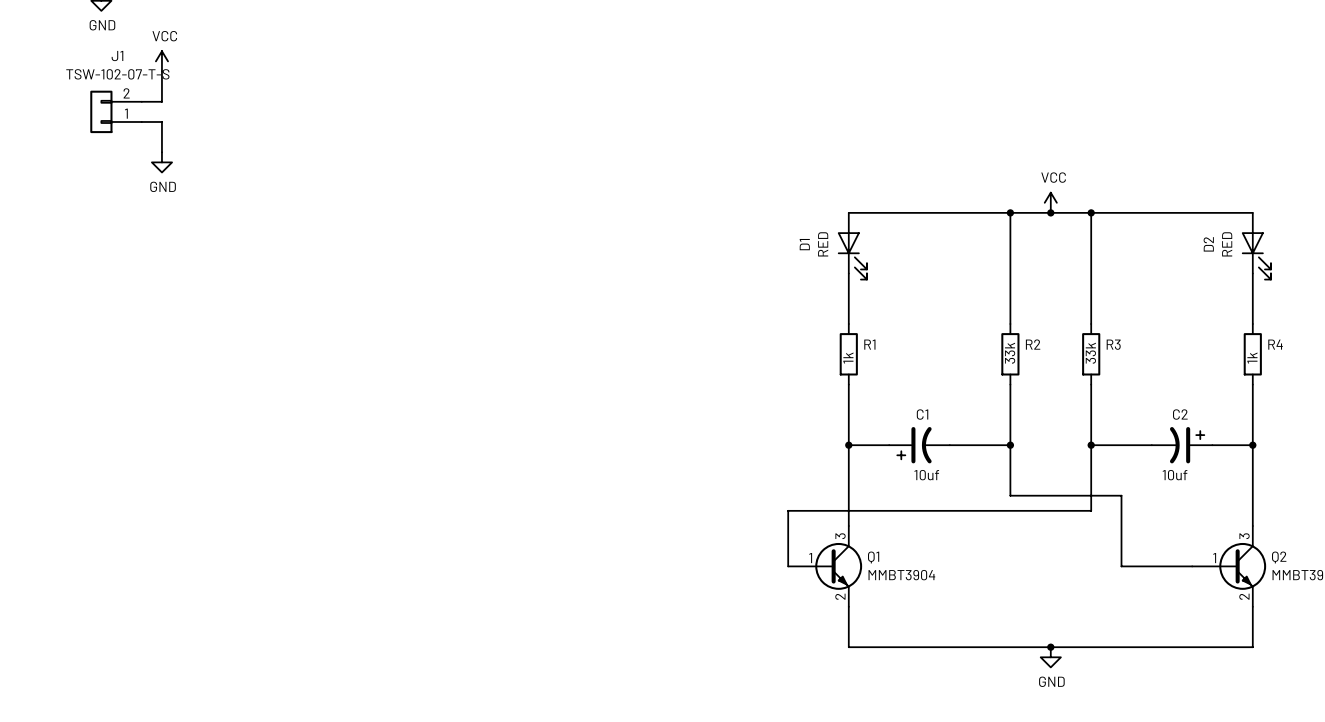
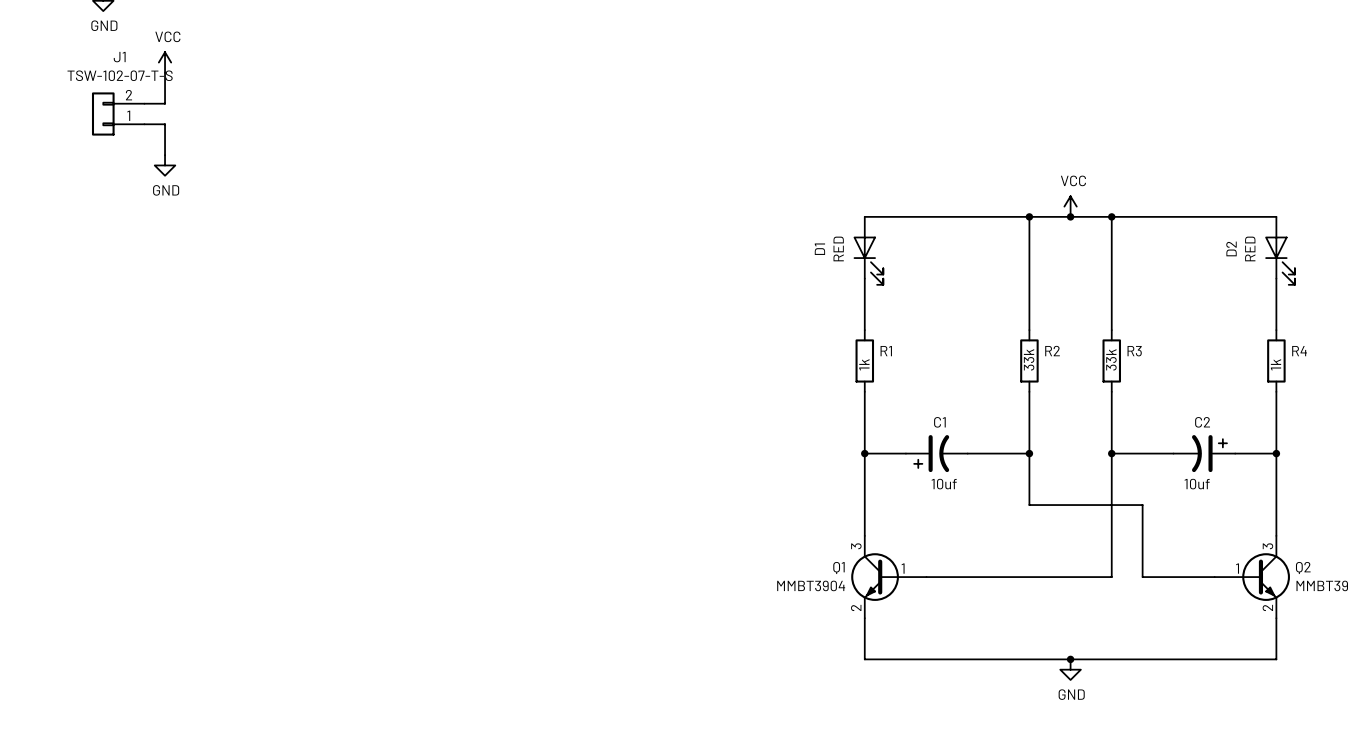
wire: (1091, 510) (788, 510) (788, 566) -> (1111, 520) (1111, 577) (926, 577)
Q1 flip: as is (838, 566) -> left-right (875, 577)

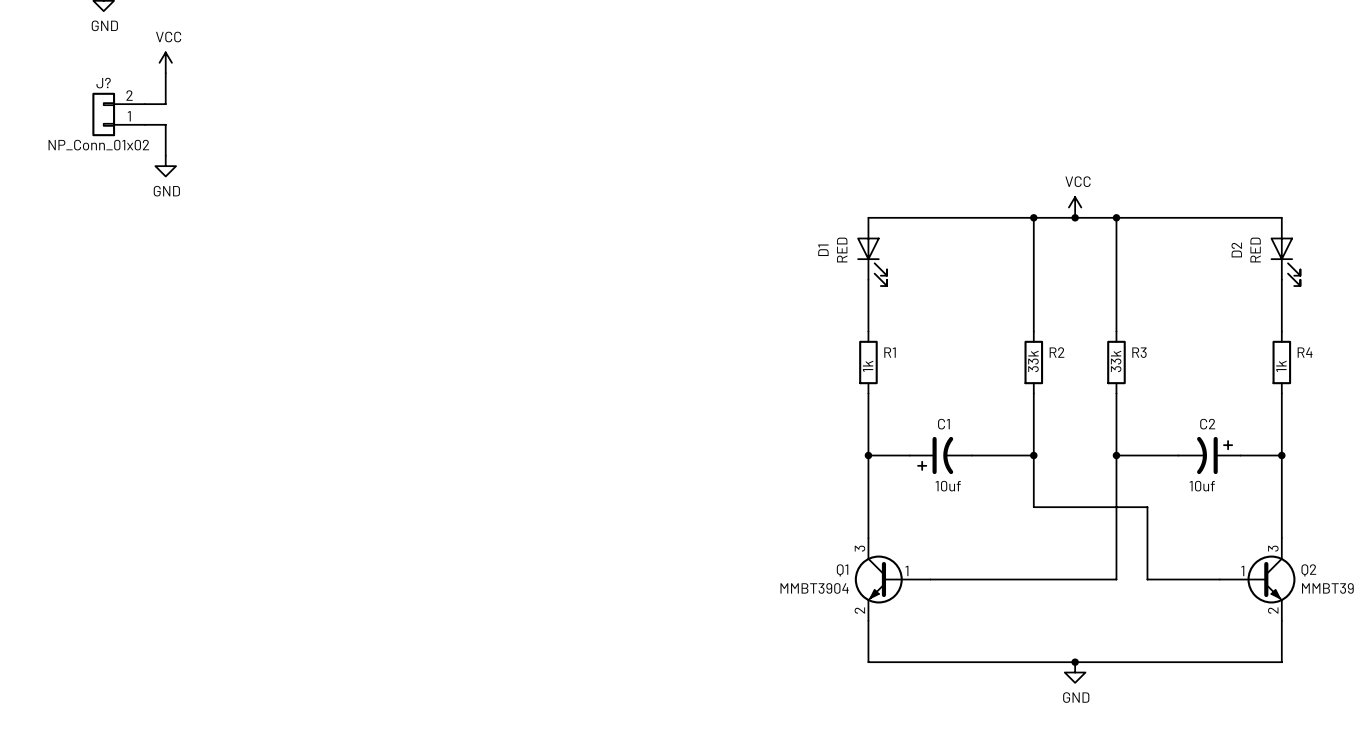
J1 name: J1 (119, 57) -> J? (103, 83)
J1 text: TSW-102-07-T-S (120, 75) -> NP_Conn_01x02 (98, 145)

